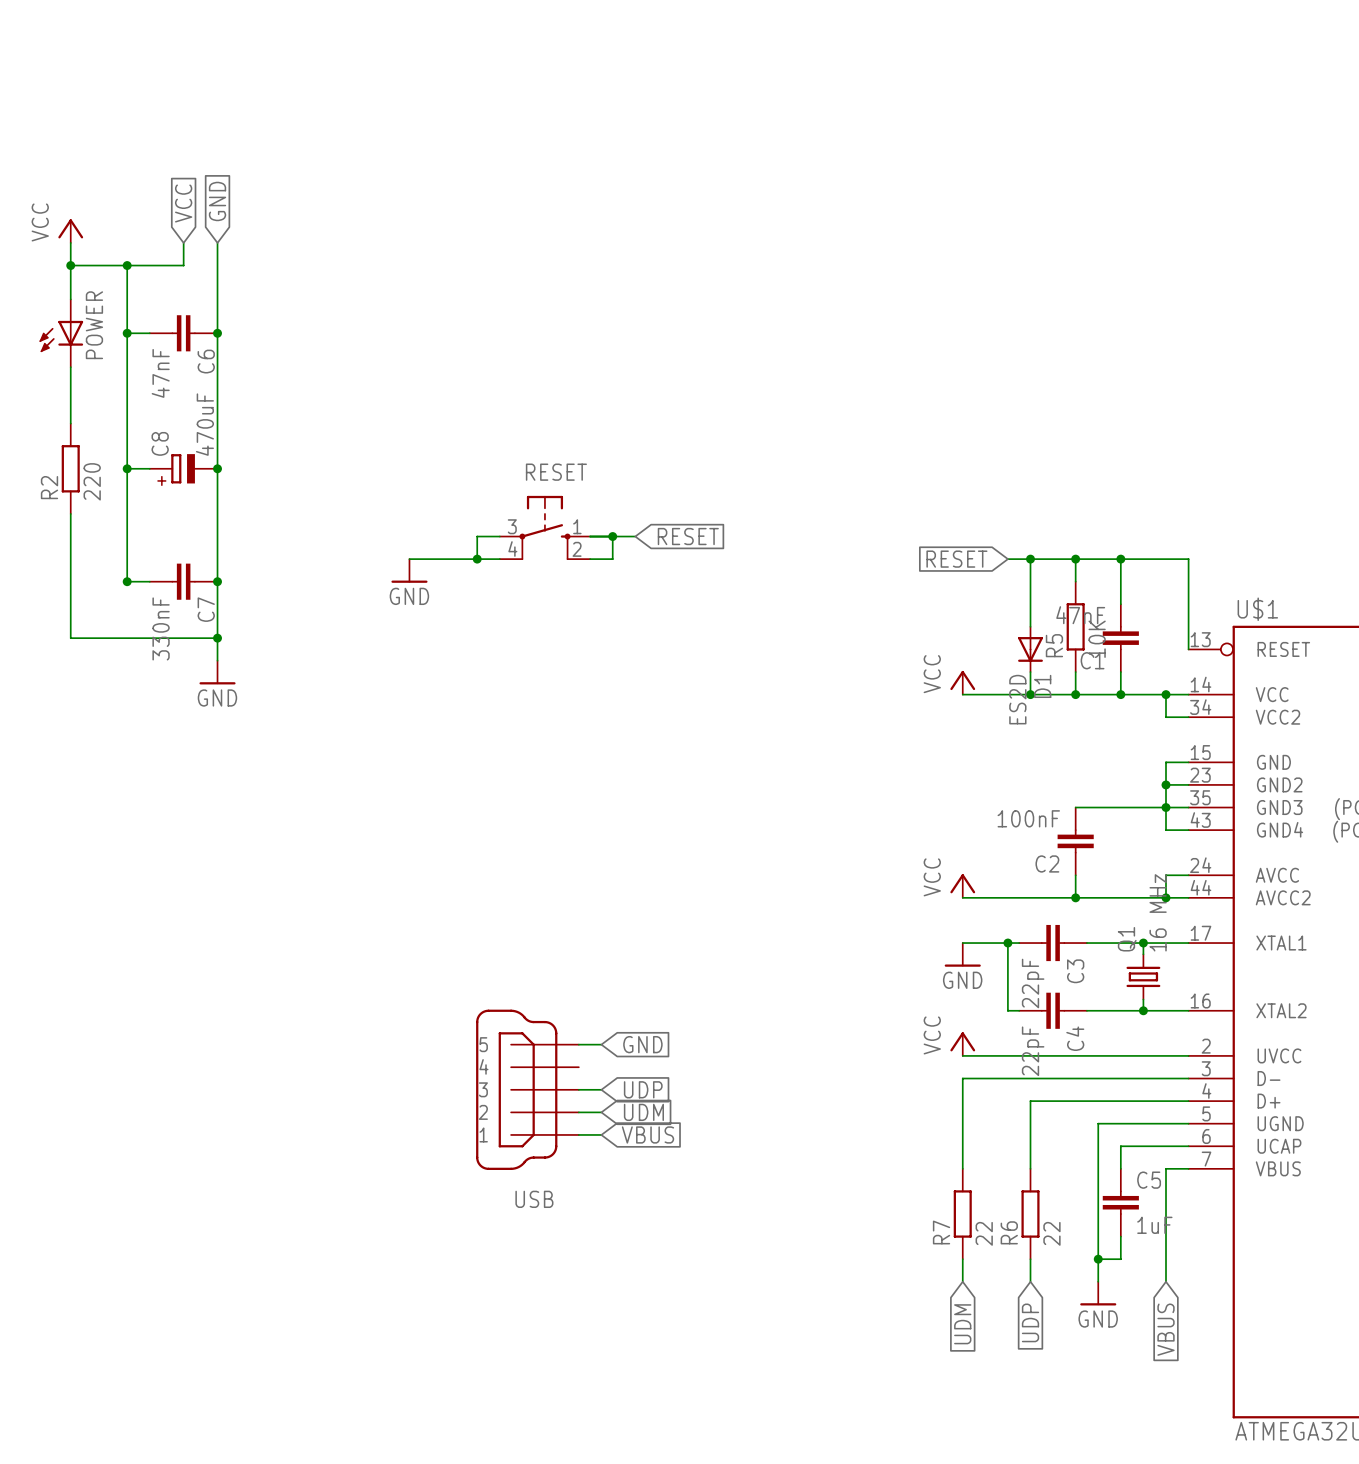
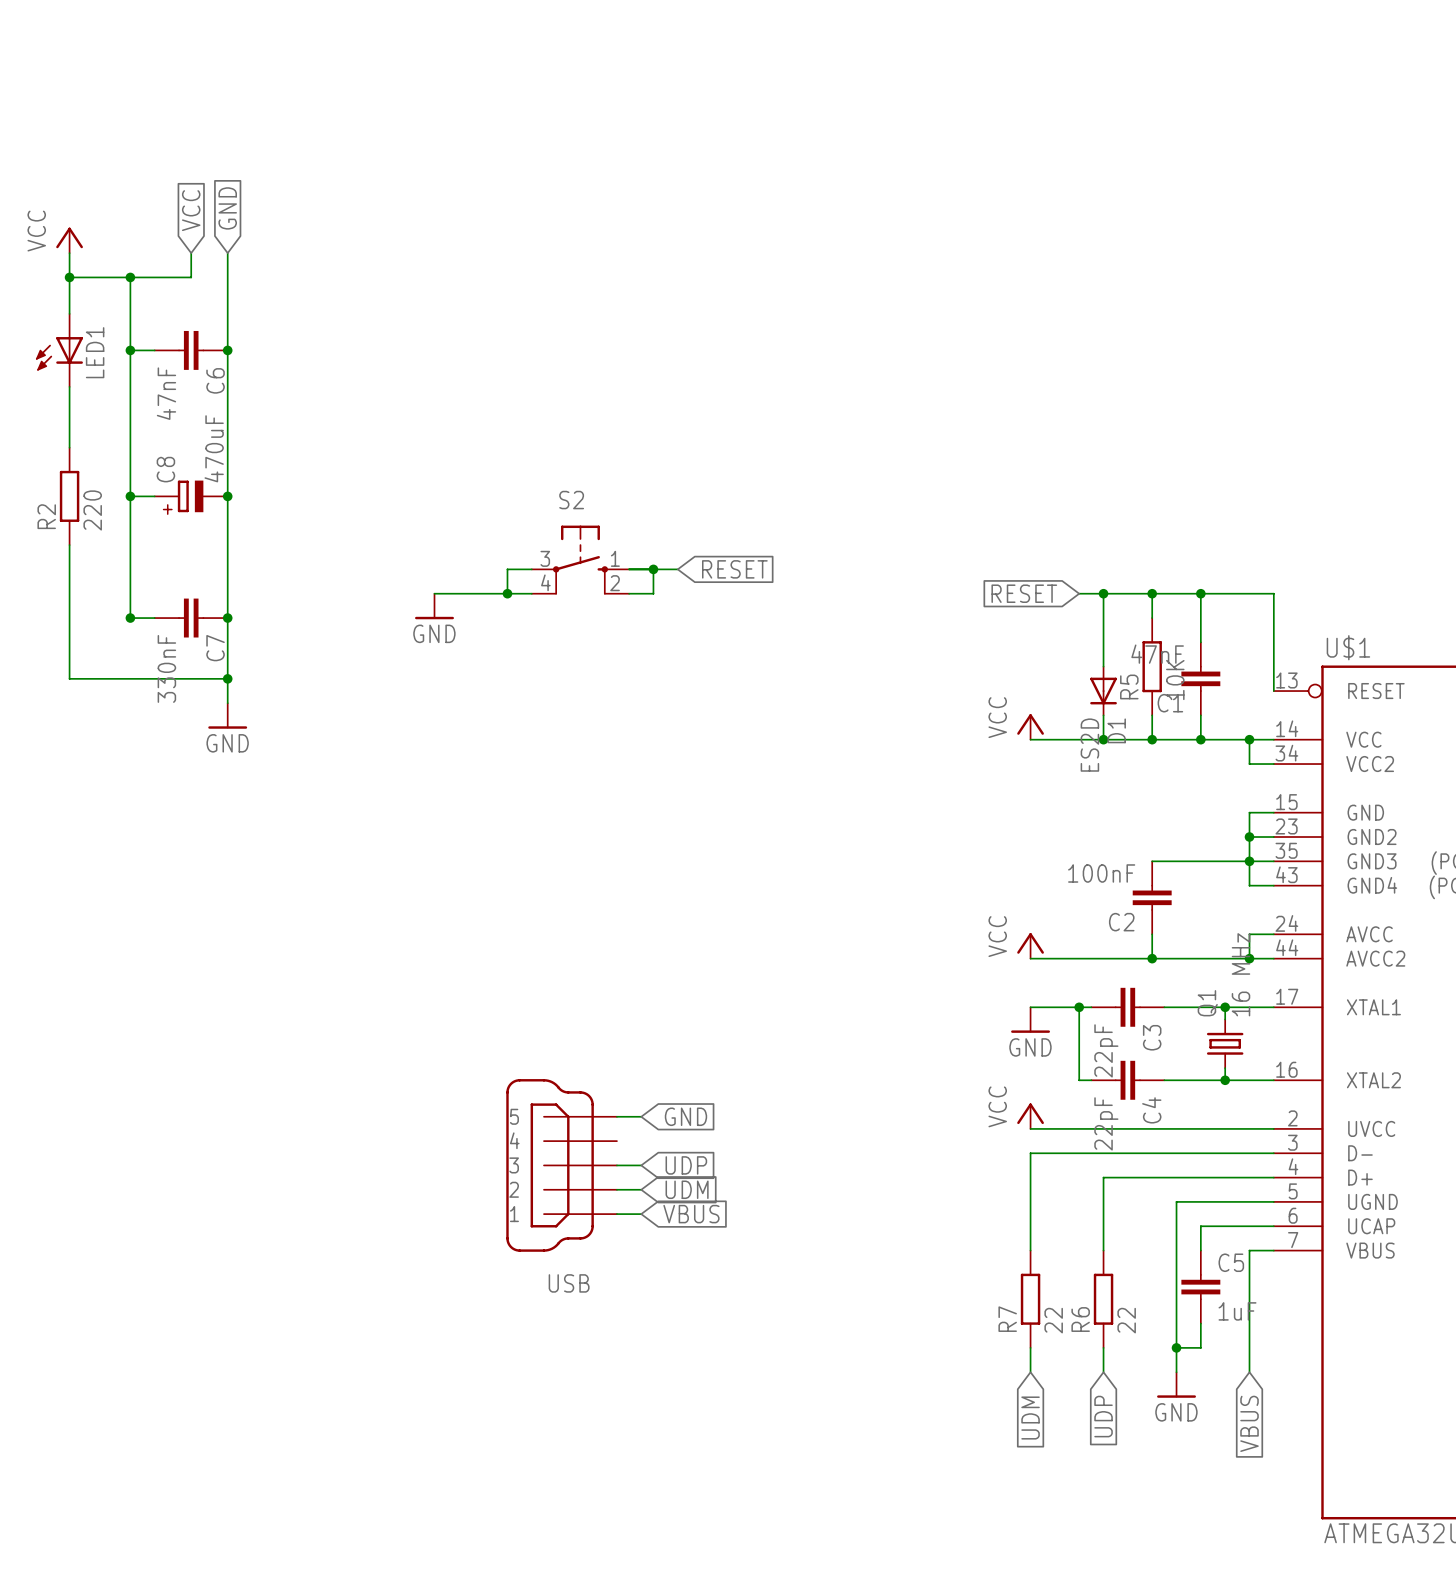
POWER name: POWER (94, 325) -> LED1 (95, 352)
RESET name: RESET (556, 472) -> S2 (571, 500)

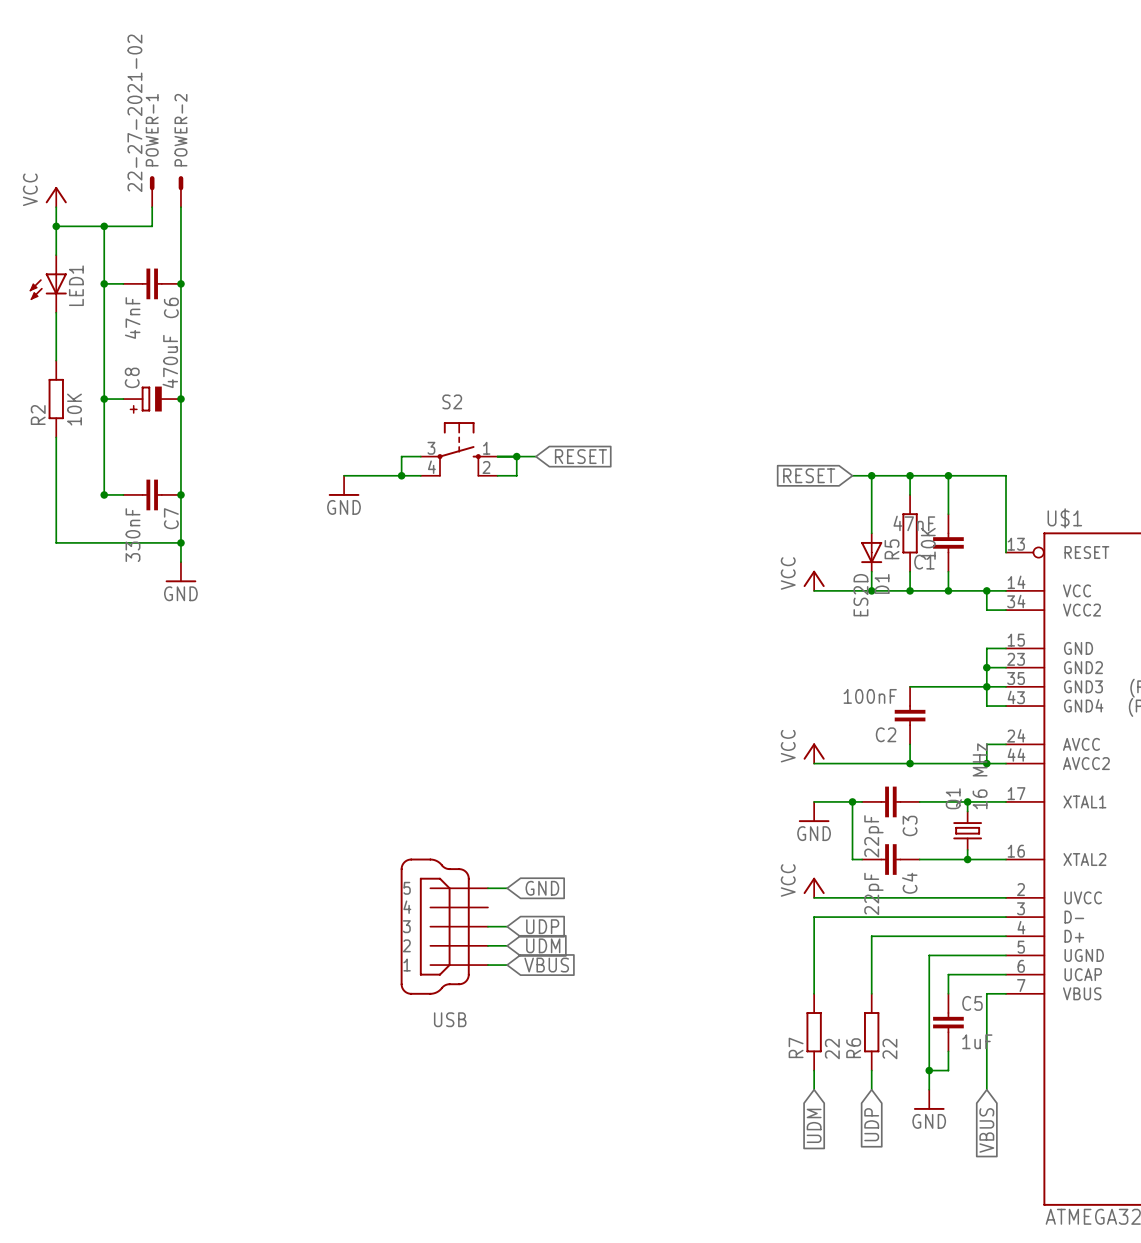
global label: GND (227, 208) -> none
global label: VCC (191, 210) -> none
POWER-1: none -> 22-27-2021-02 (152, 191)
POWER-2: none -> (180, 191)
R2 value: 220 (92, 510) -> 10K (74, 409)

